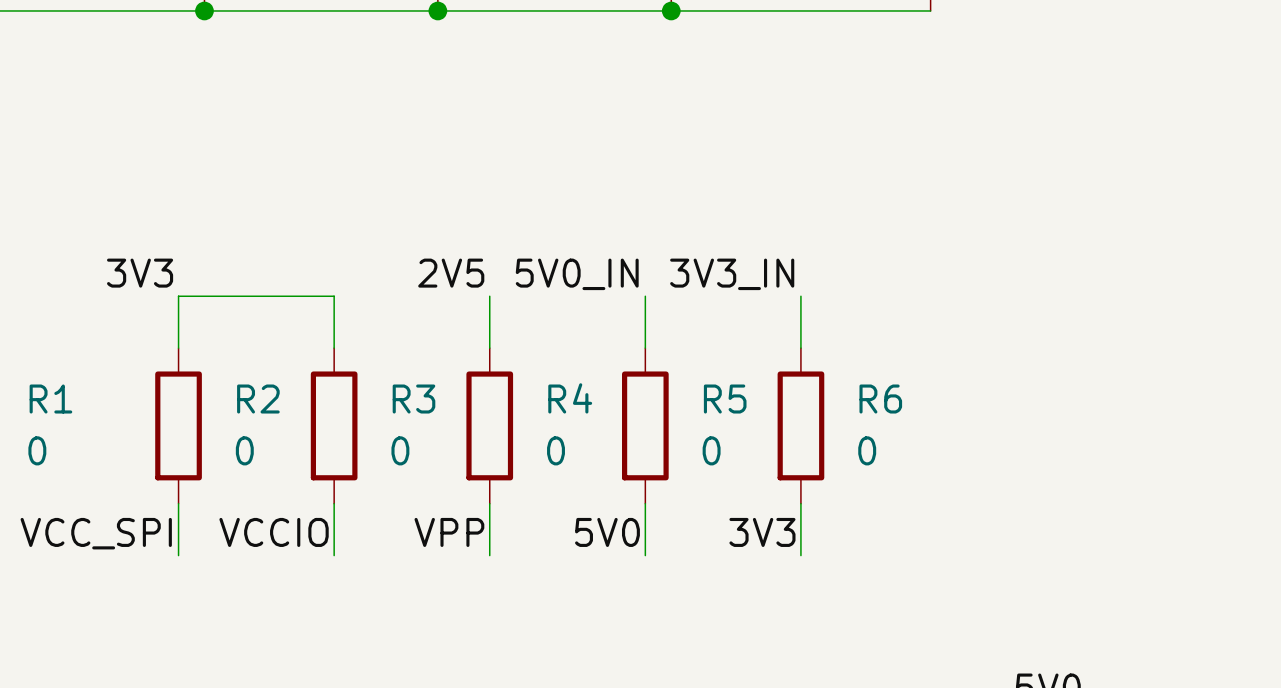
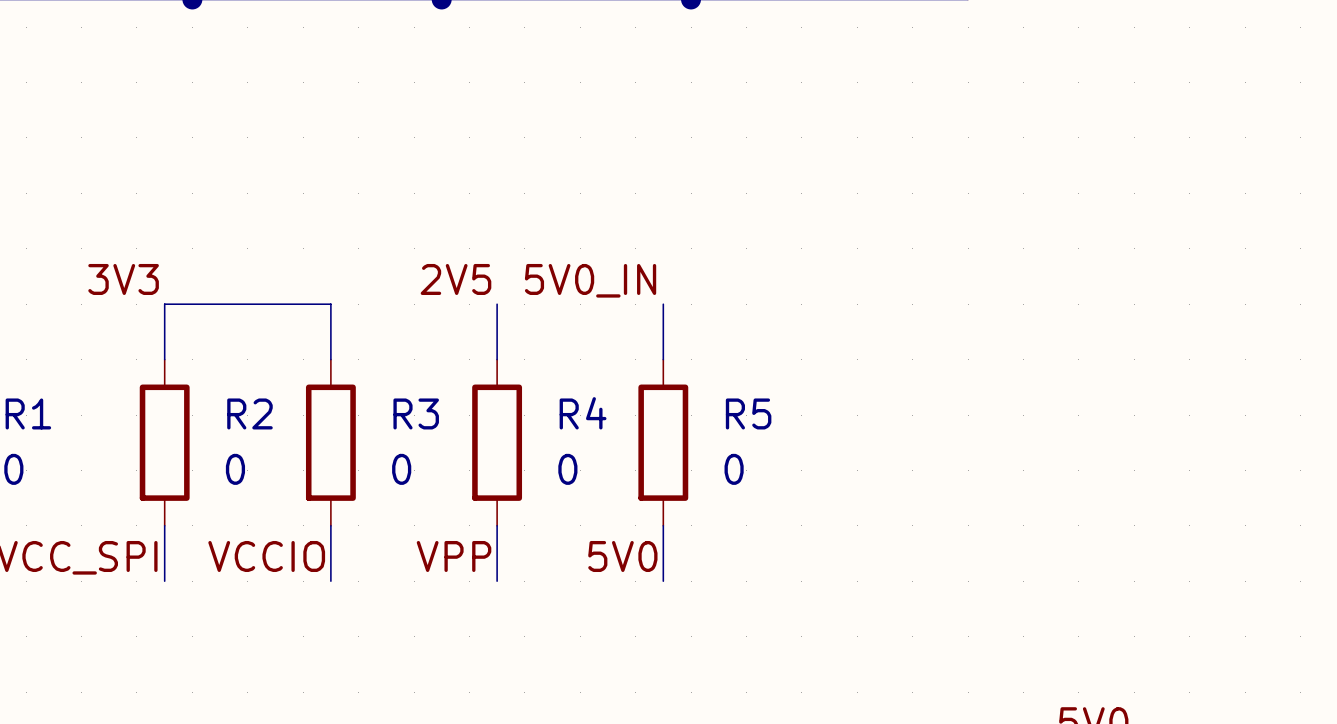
label: 3V3_IN (732, 274) -> none
wire: (800, 296) (800, 348) -> none
R6: 0 (800, 425) -> none
wire: (800, 503) (800, 555) -> none
label: 3V3 (762, 532) -> none

